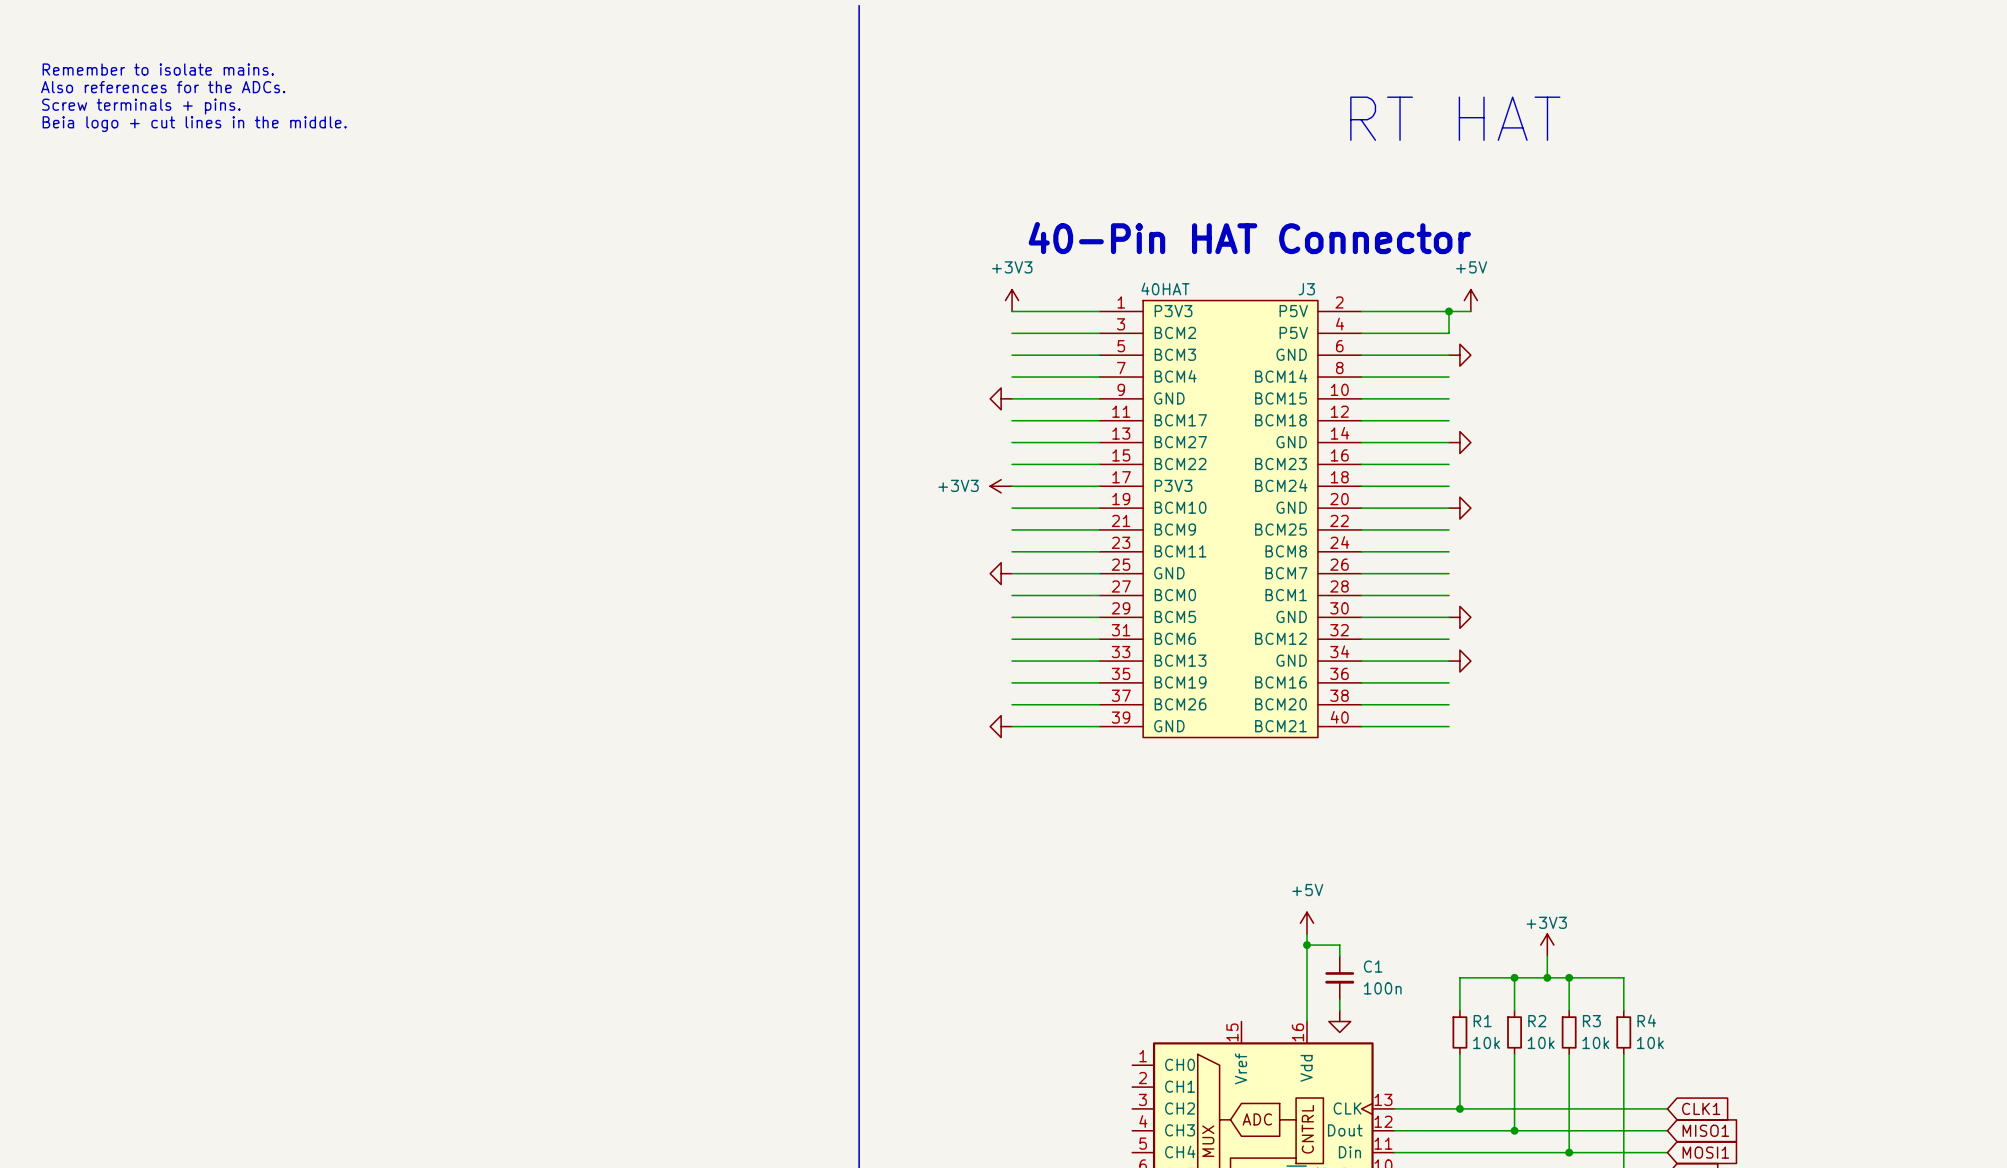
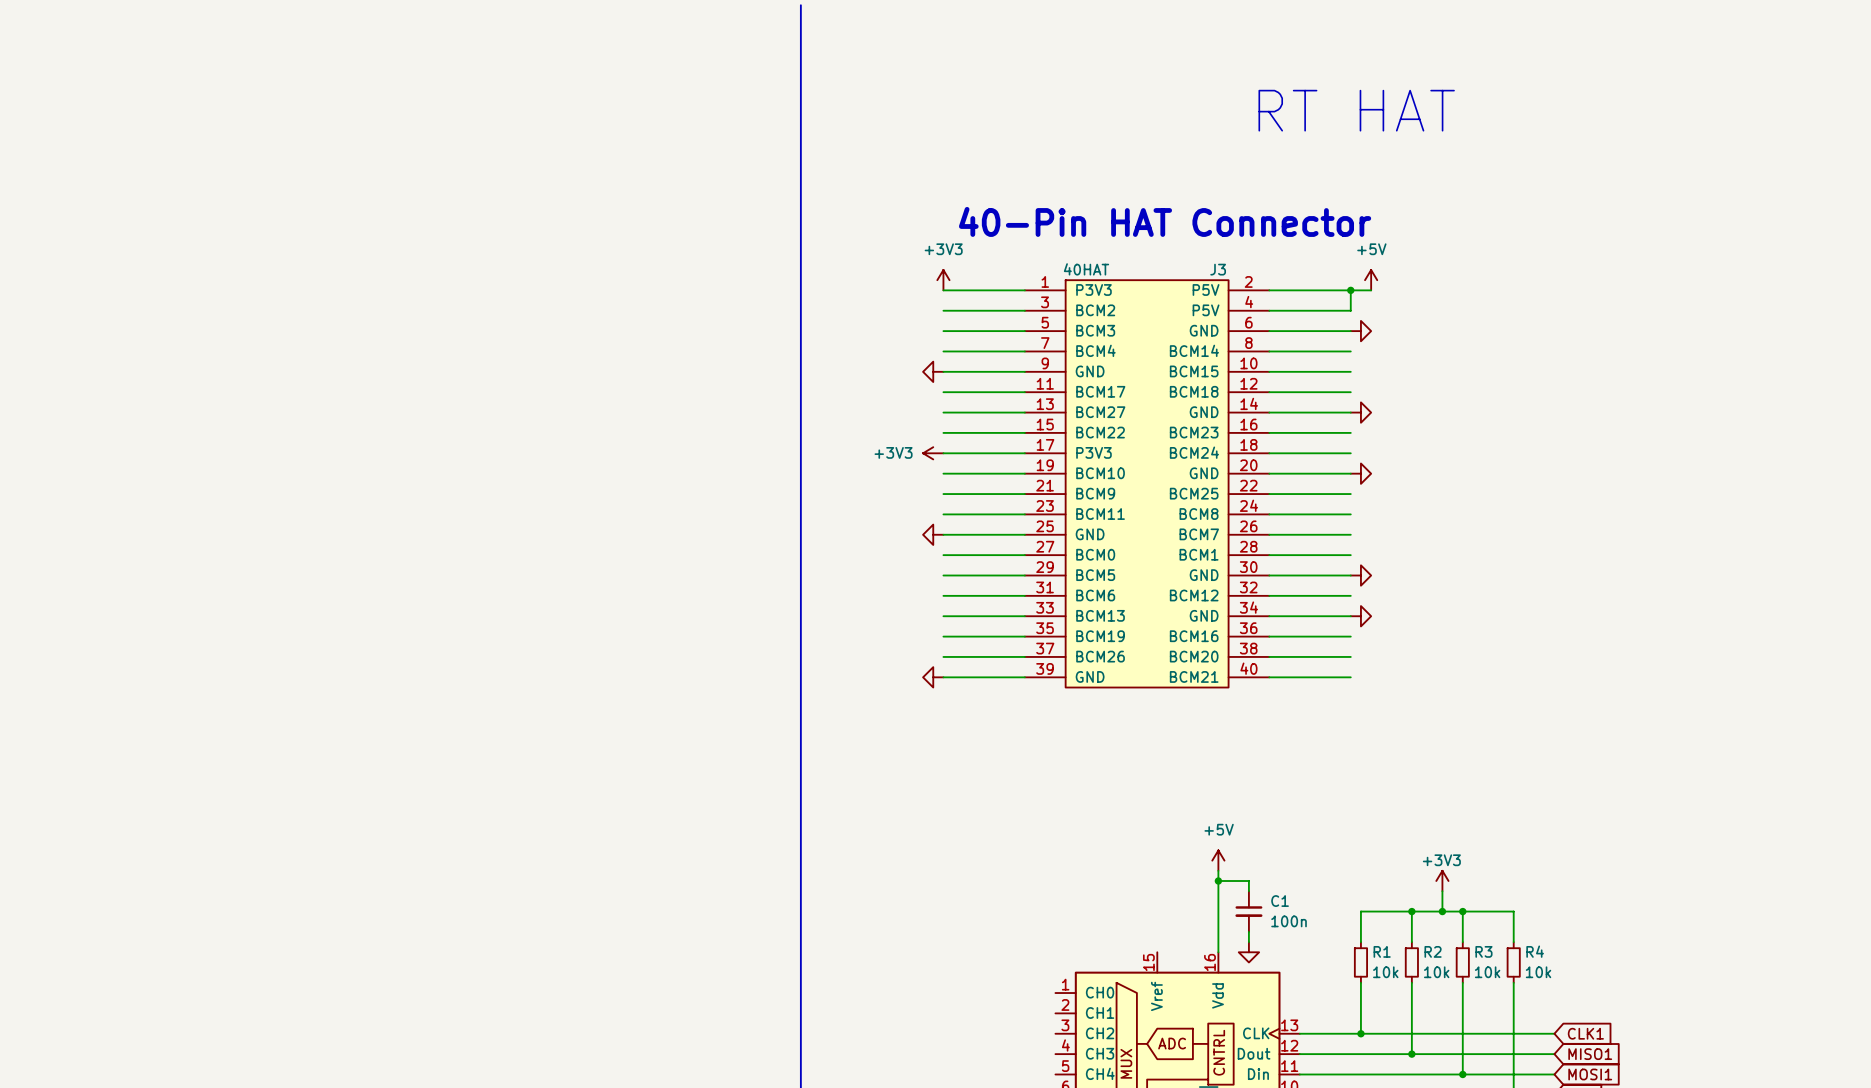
text: Remember to isolate mains. (158, 69) -> none
text: Also references for the ADCs. (163, 87) -> none
text: Screw terminals + pins. (141, 106) -> none
text: Beia logo + cut lines in the middle. (194, 124) -> none

